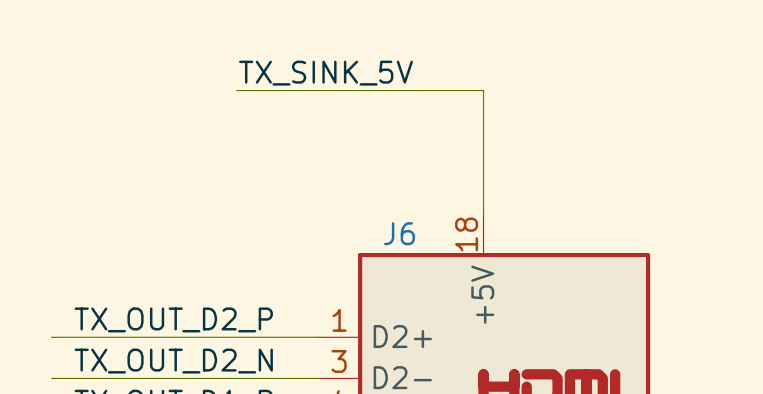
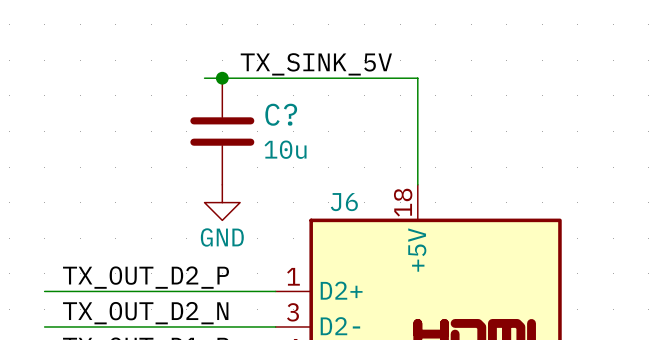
label position: TX_SINK_5V (326, 73) -> TX_SINK_5V (316, 64)
junction: none -> (222, 78)
C?: none -> (222, 131)
power symbol: none -> GND (222, 202)

